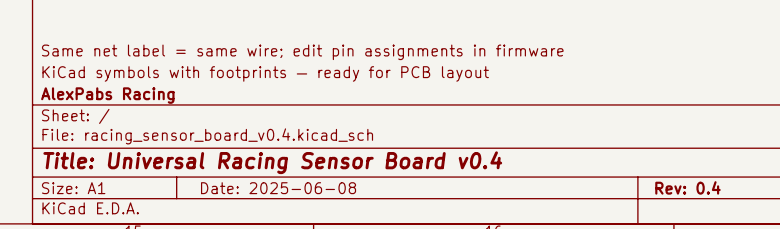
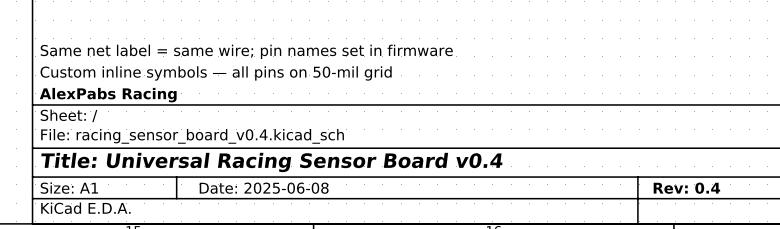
title block: Same net label = same wire; edit pin assignments in firmware (302, 52) -> Same net label = same wire; pin names set in firmware (246, 51)
title block: KiCad symbols with footprints — ready for PCB layout (265, 73) -> Custom inline symbols — all pins on 50-mil grid (216, 73)

